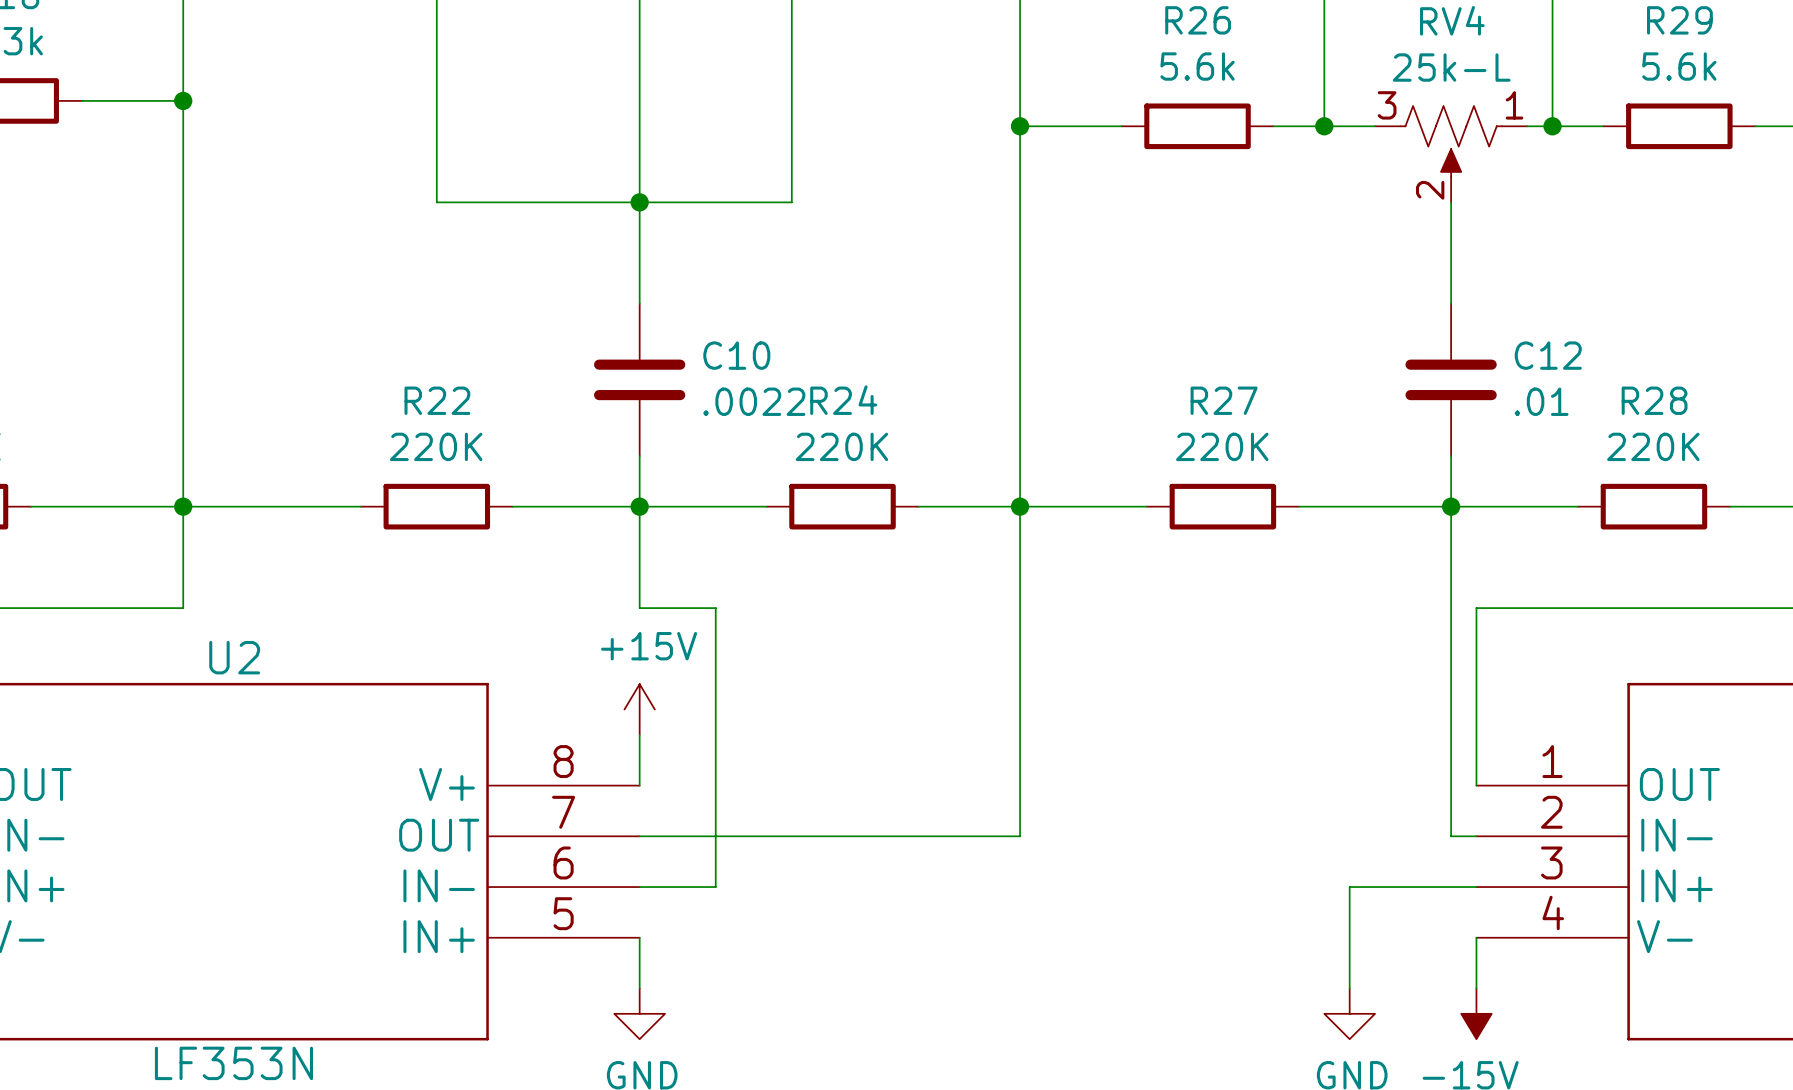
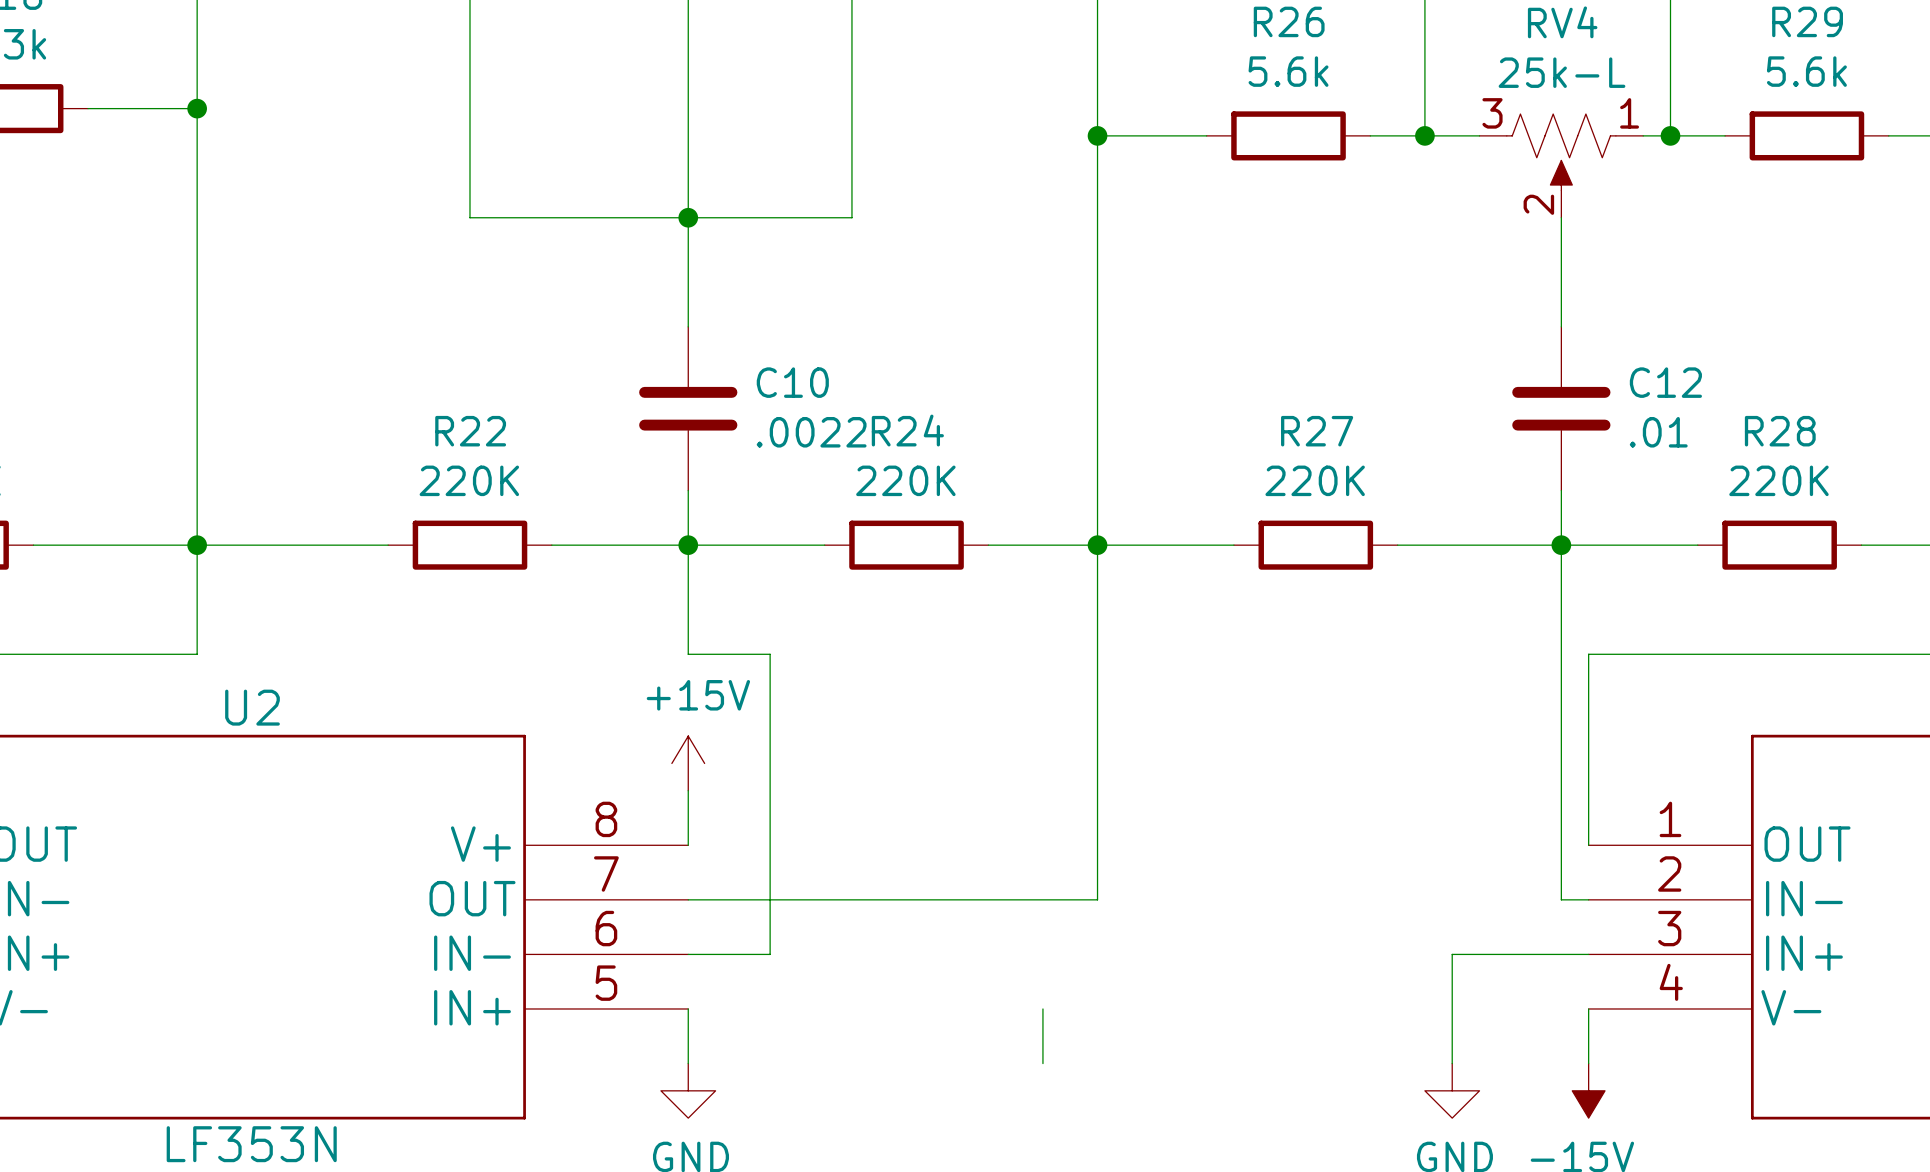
wire: none -> (1042, 1008) (1042, 1063)

